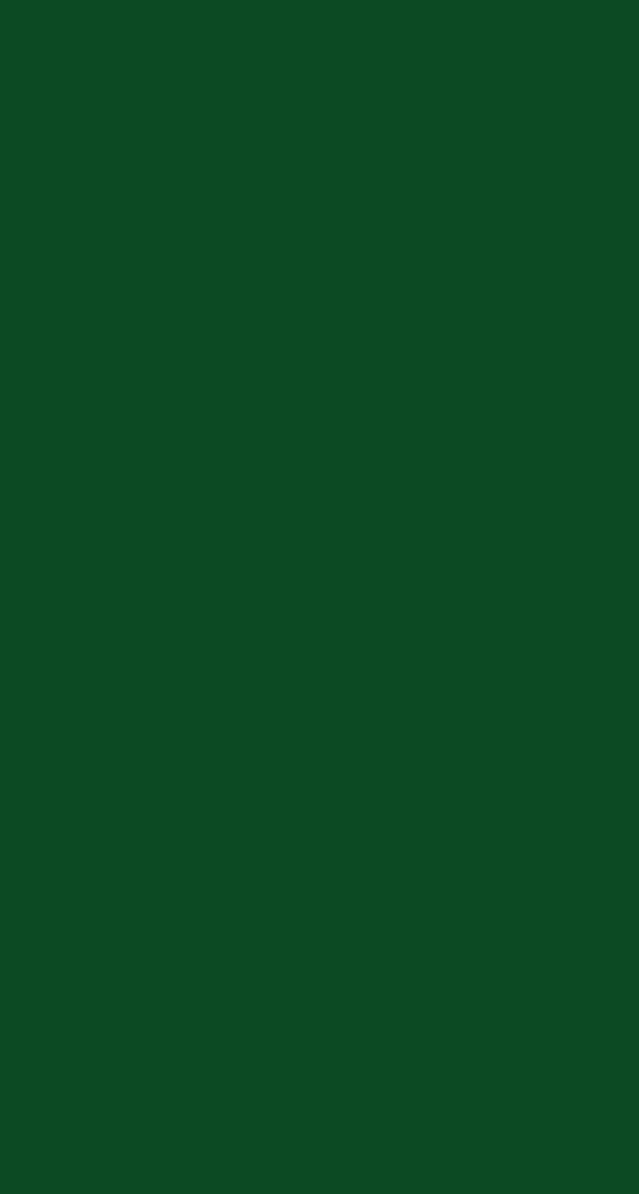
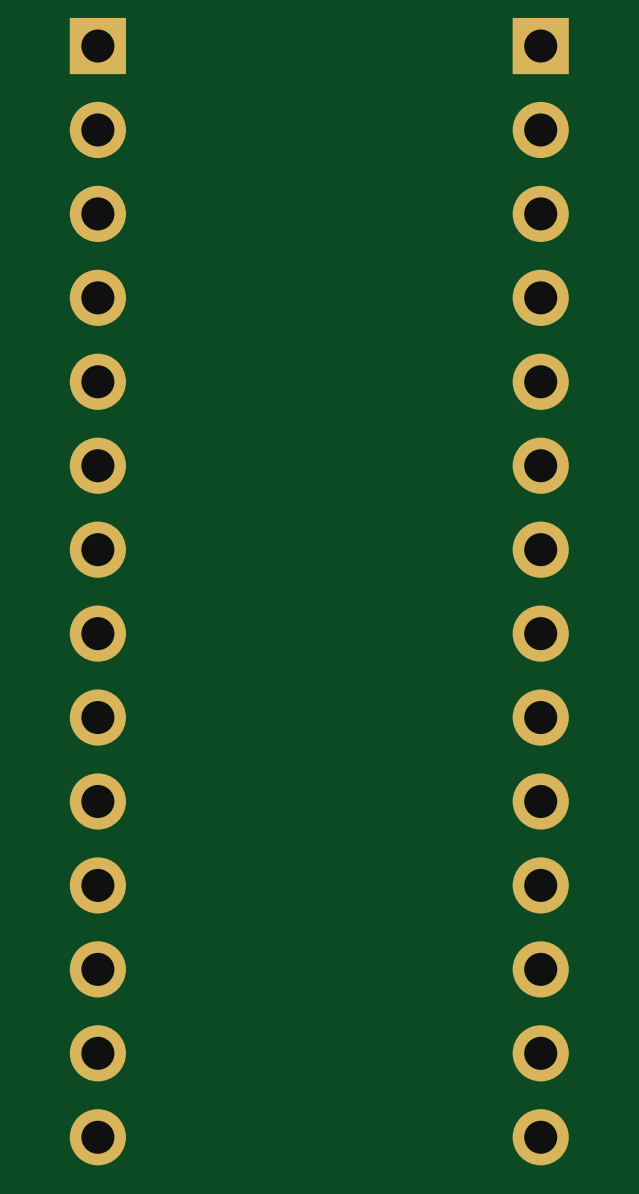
part: none -> (97, 591)
part: none -> (540, 591)

